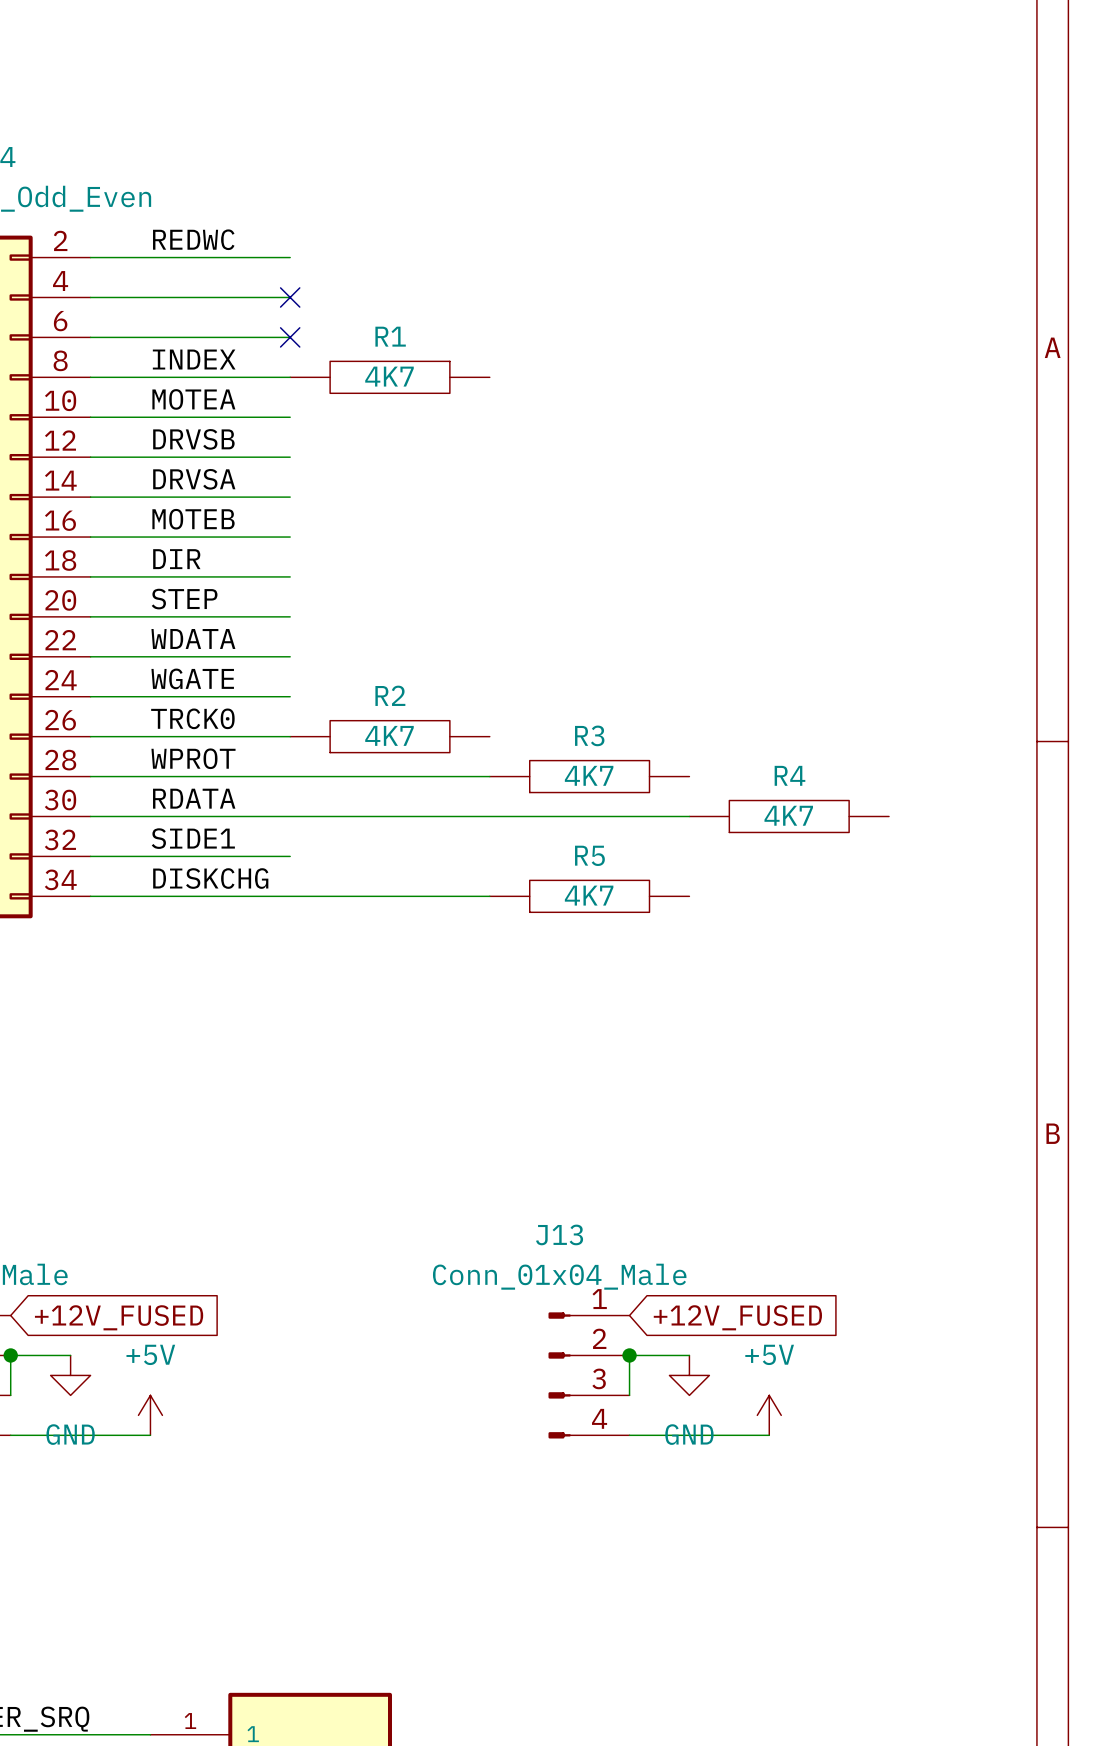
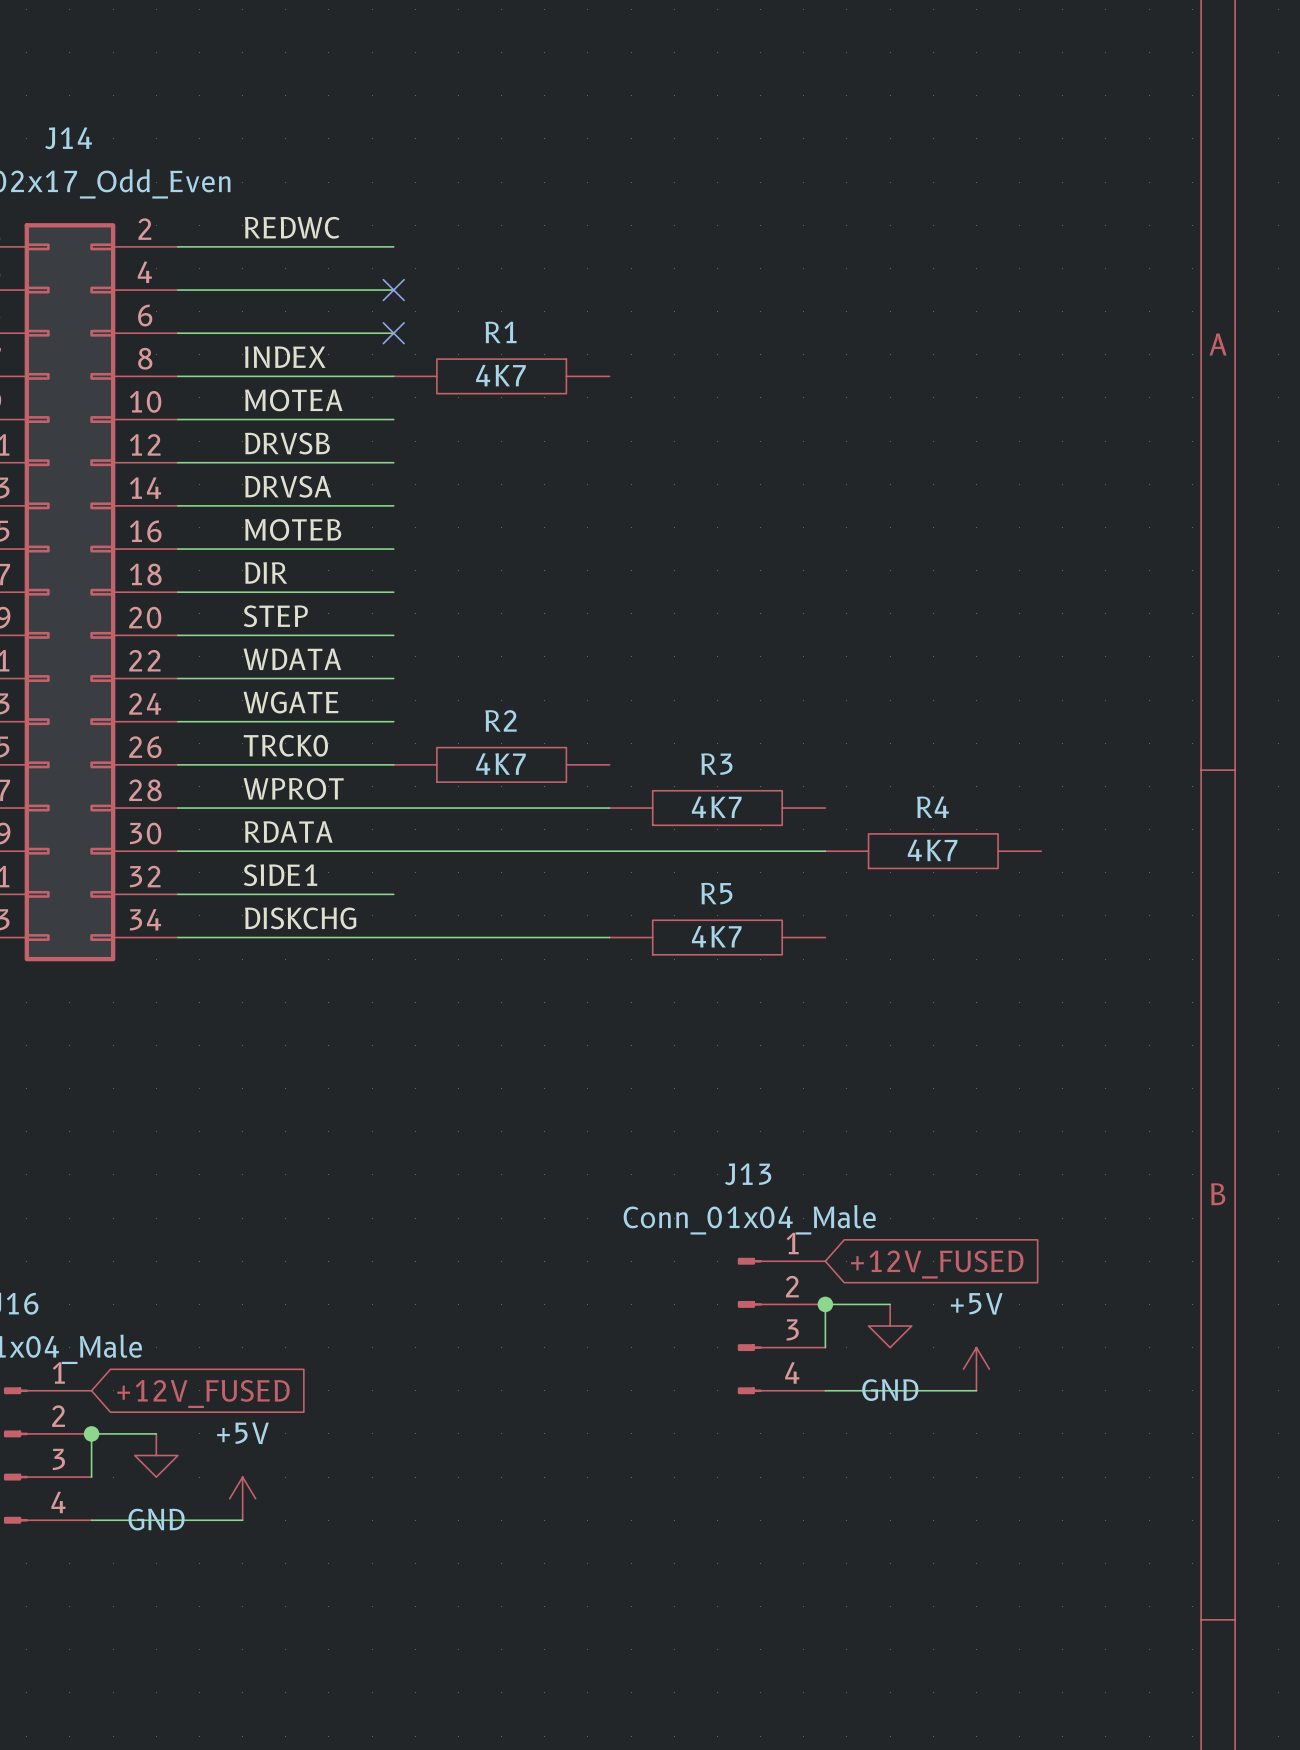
junction: none -> (825, 1304)
global label position: +12V_FUSED (737, 1317) -> +12V_FUSED (937, 1264)
junction: (629, 1355) -> none
wire: (689, 1355) (629, 1355) (629, 1395) -> (890, 1304) (825, 1304) (825, 1347)
J13 position: (589, 1375) -> (781, 1326)
power symbol position: GND (689, 1375) -> GND (890, 1326)
power symbol position: +5V (769, 1415) -> +5V (976, 1369)
wire: (629, 1435) (769, 1435) -> (825, 1390) (976, 1390)

